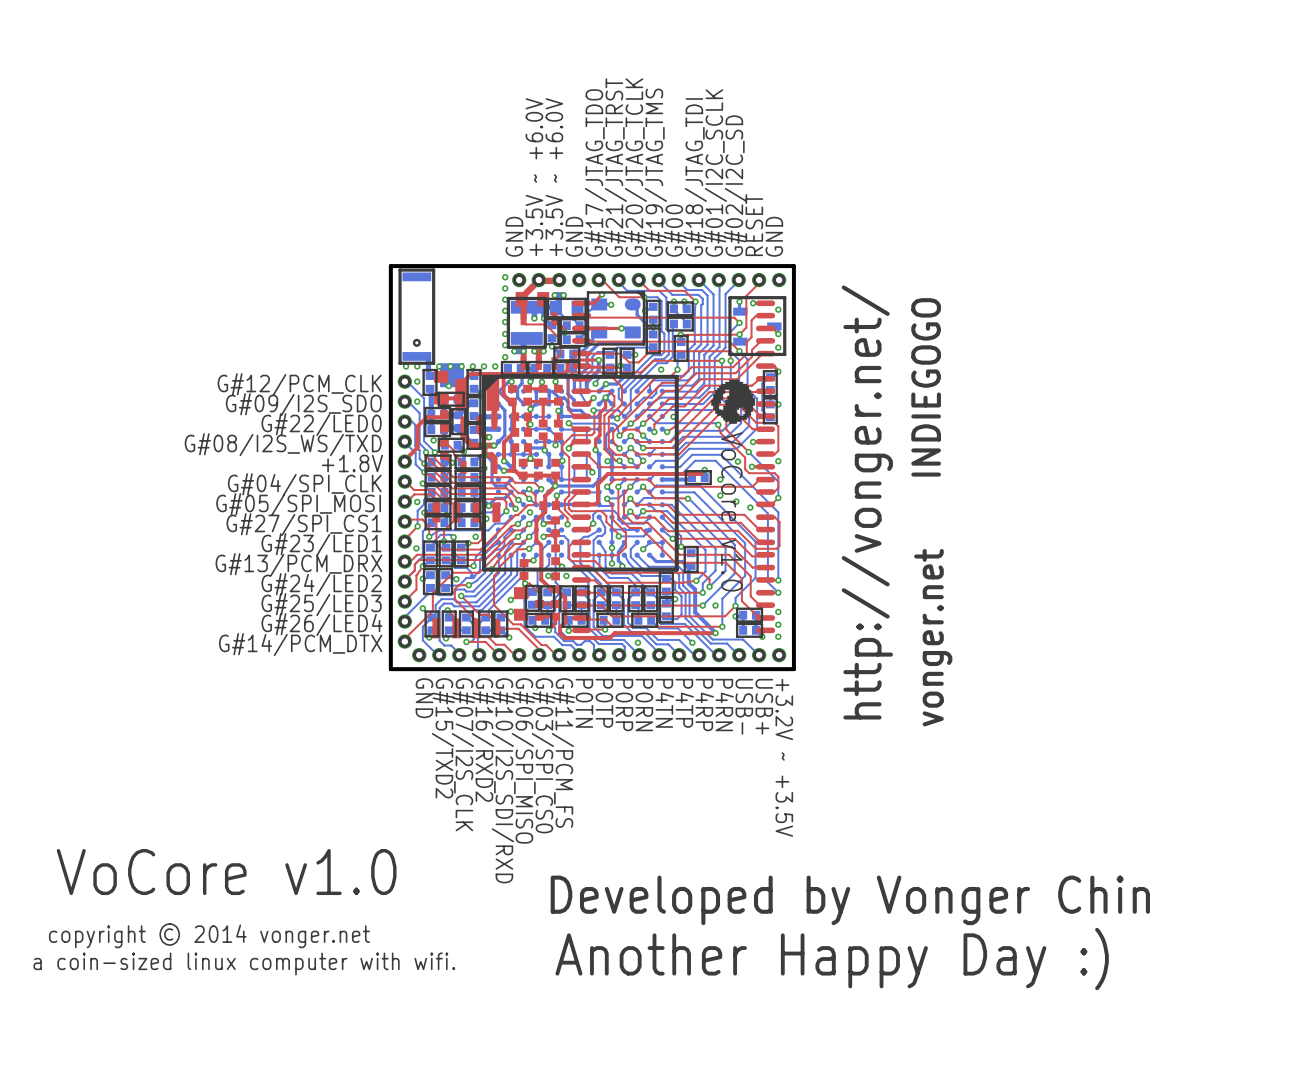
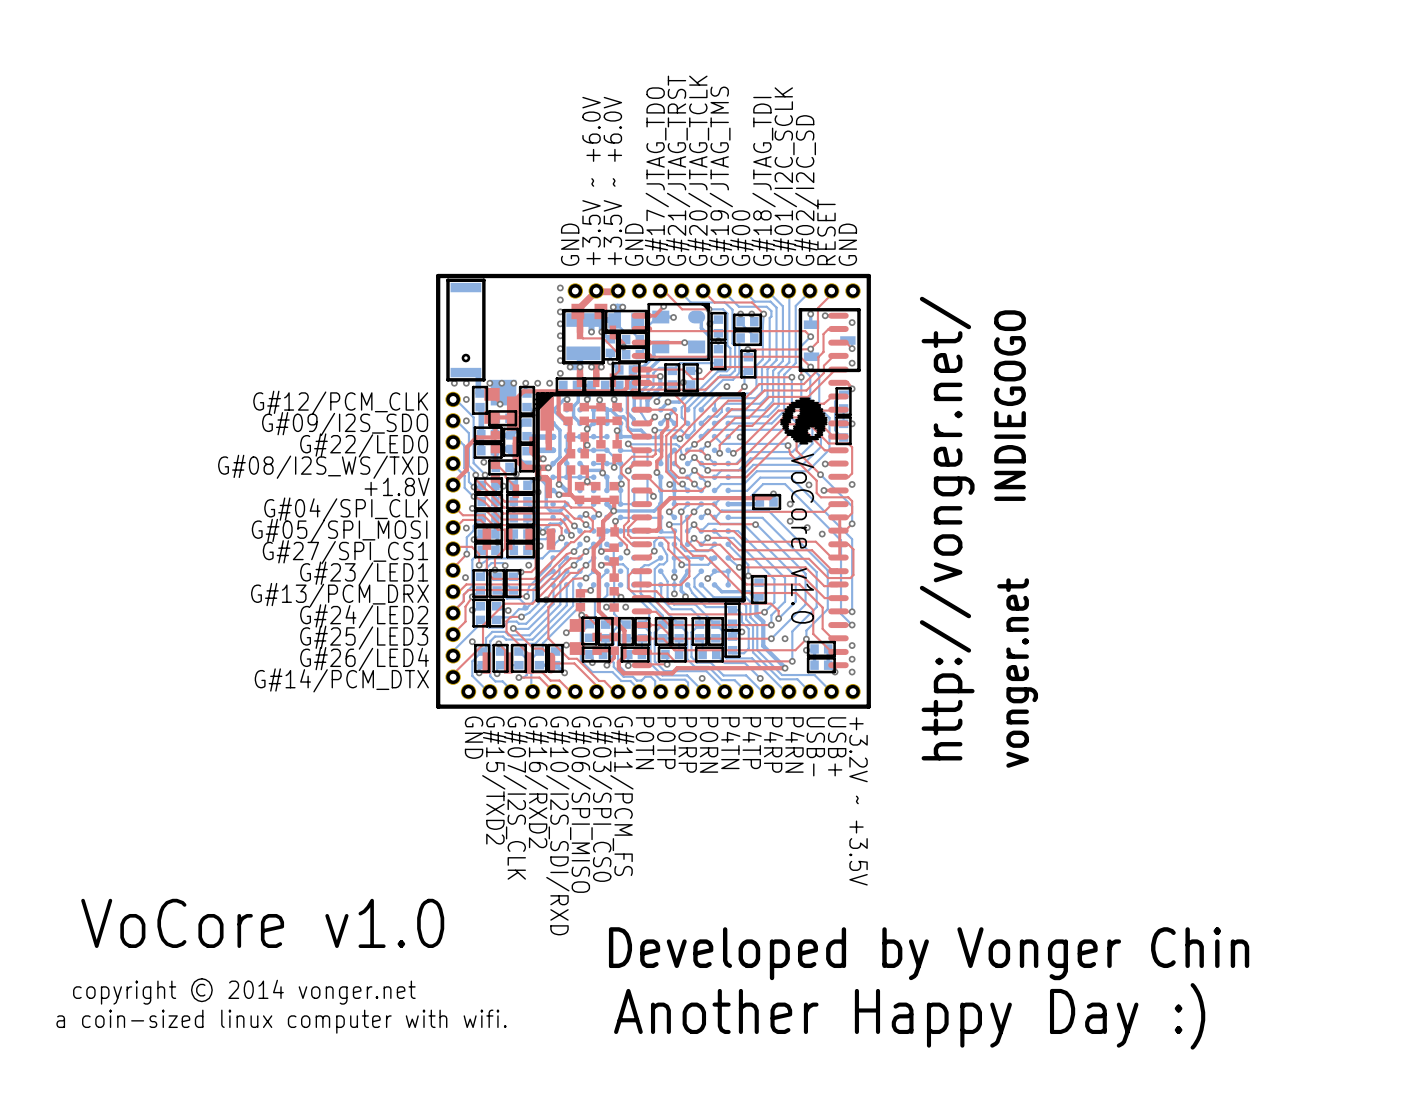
top track: none -> (839, 520) (839, 530)
top track: none -> (839, 531) (839, 557)

